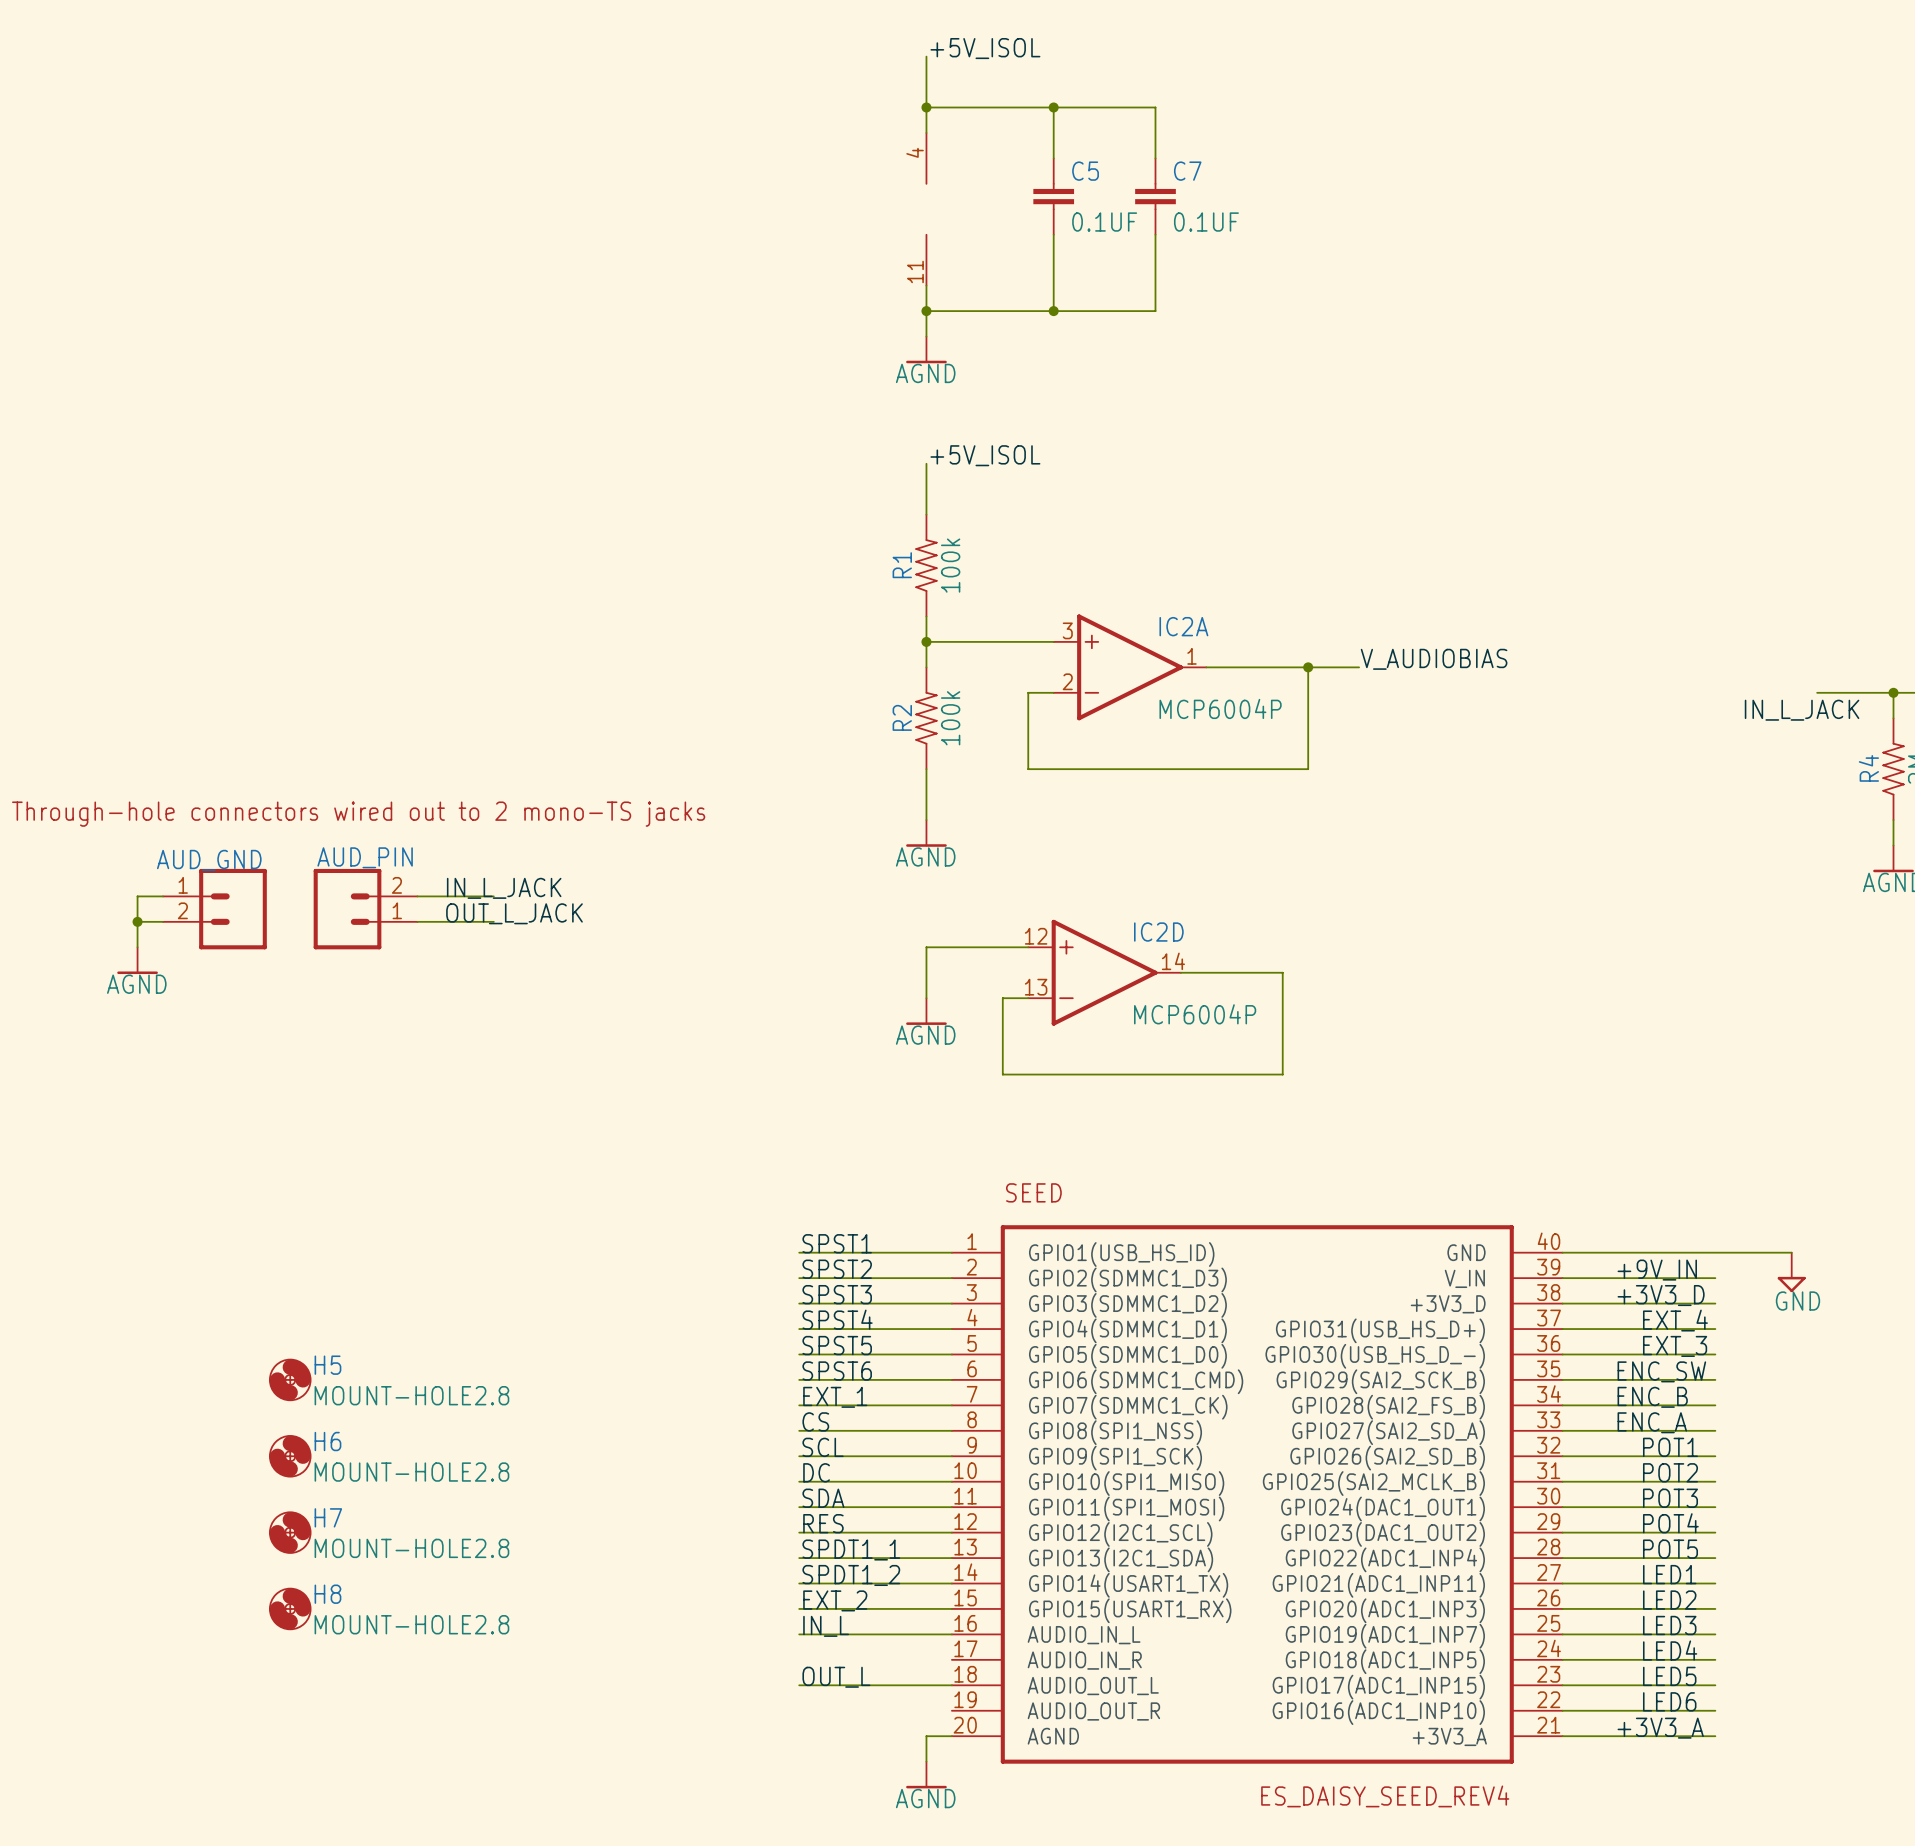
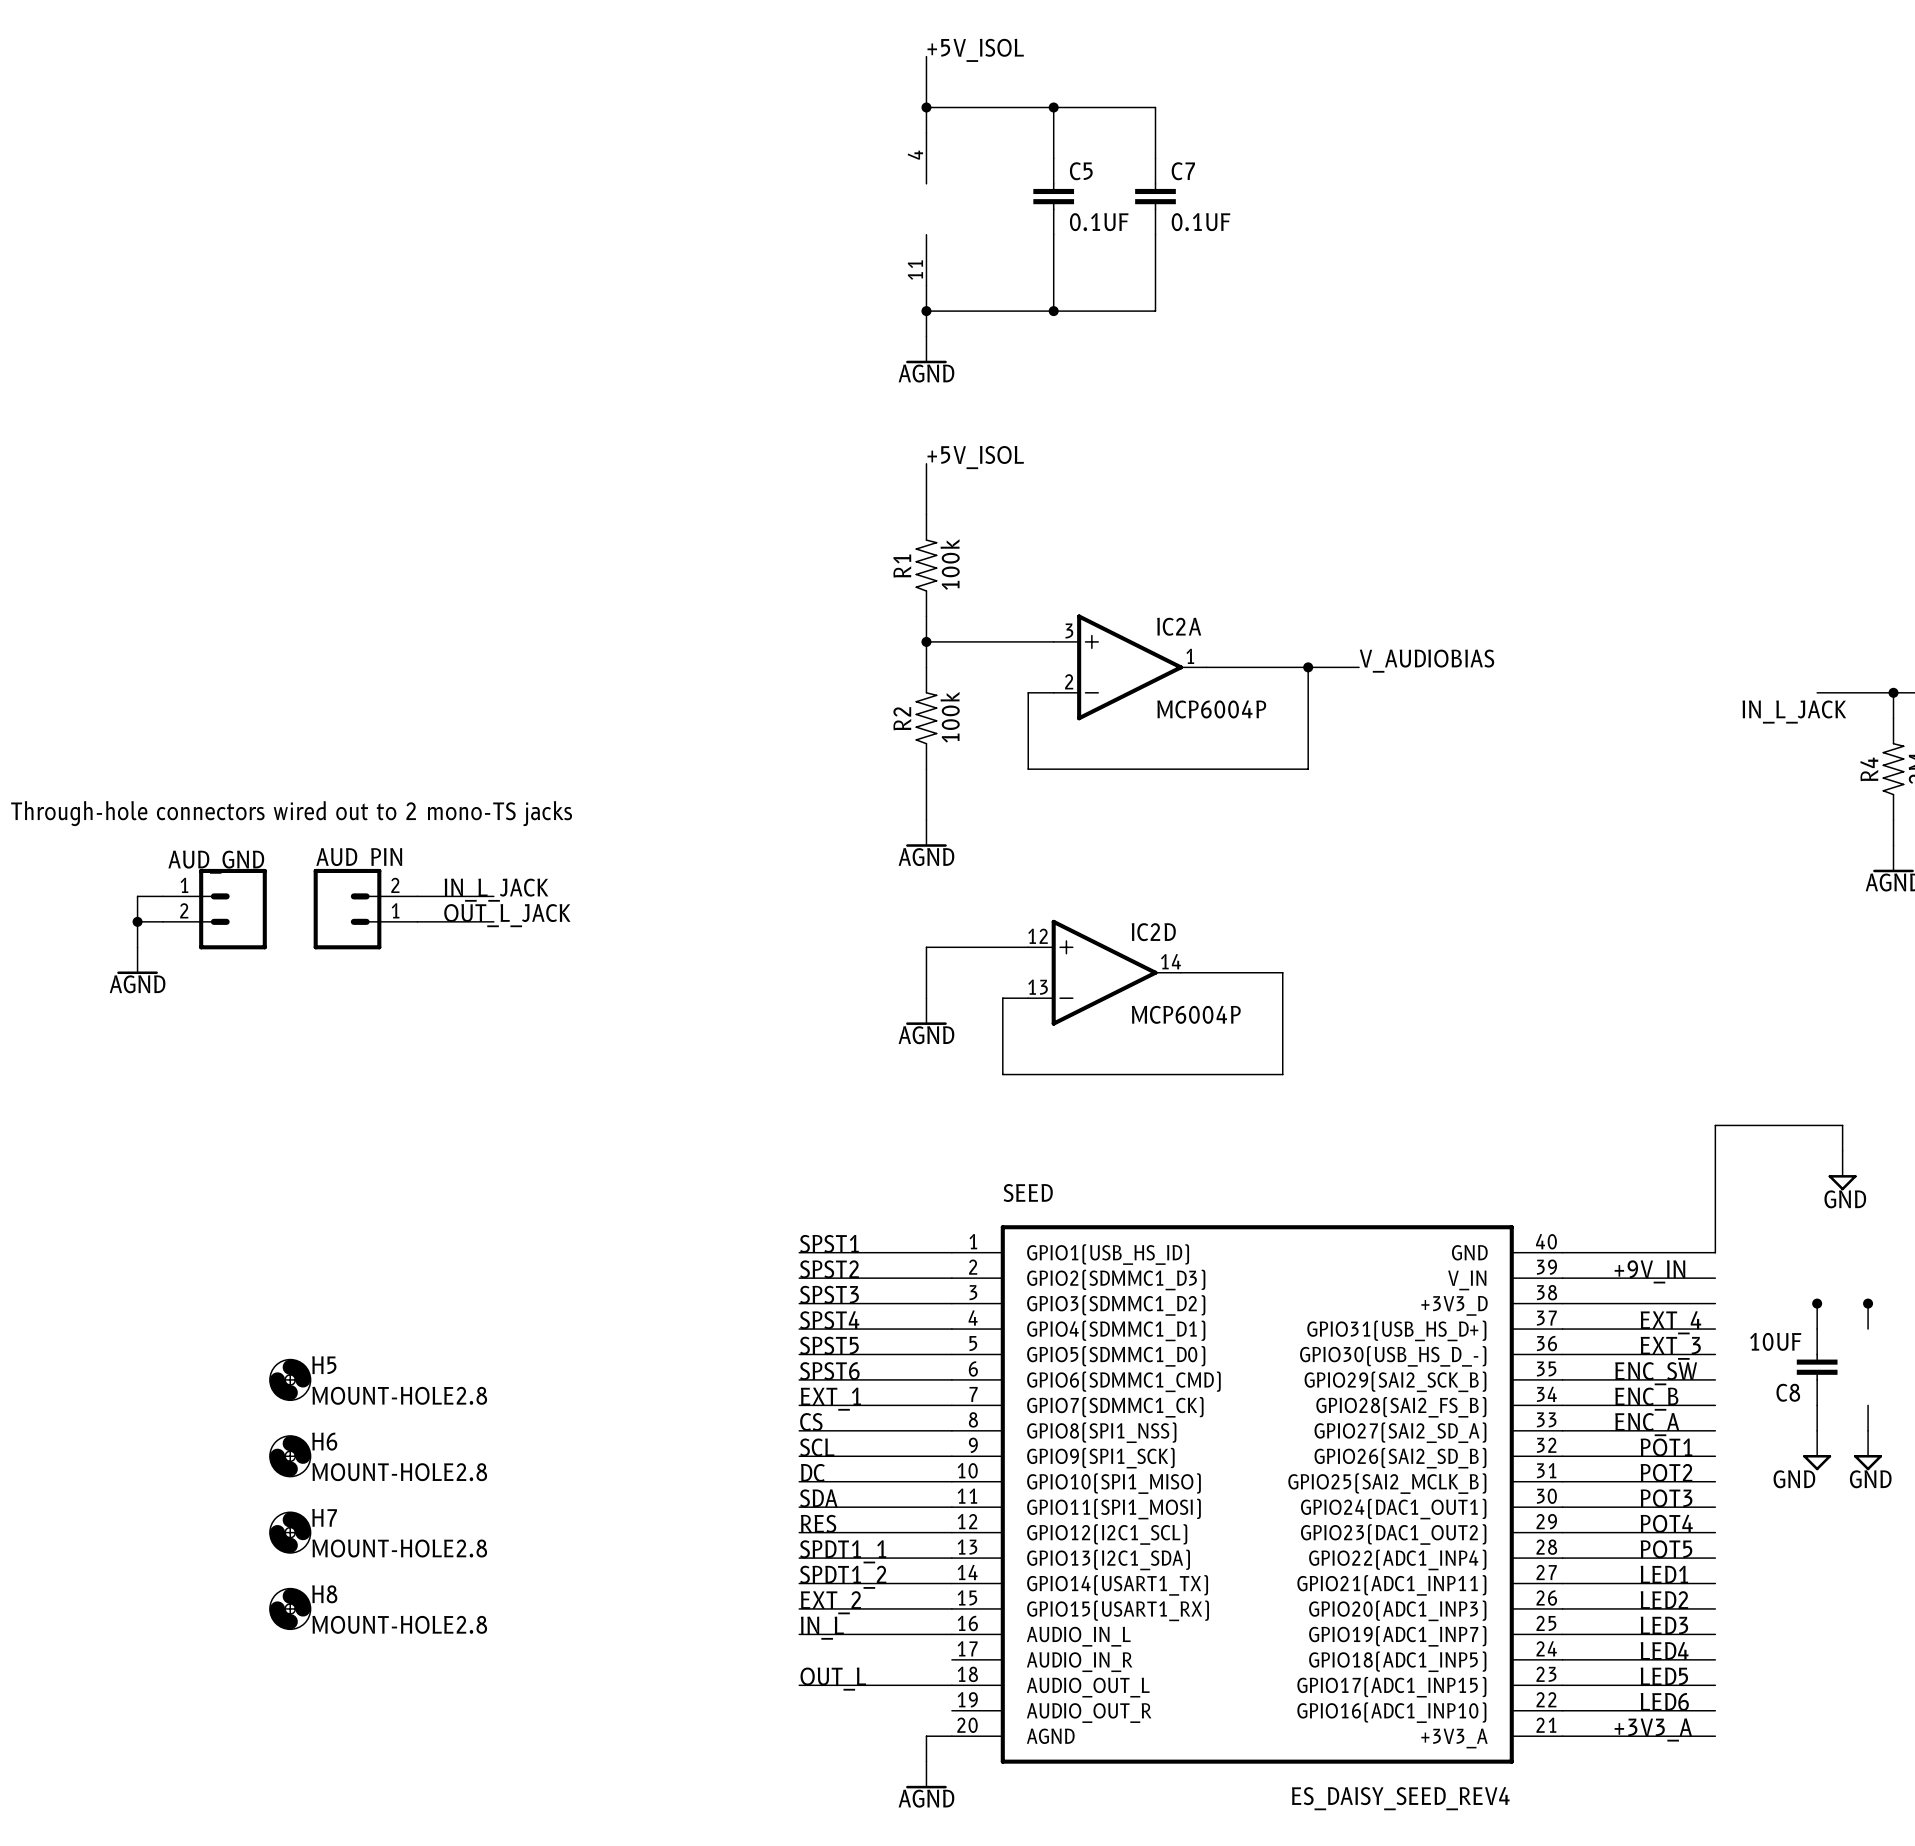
power symbol: none -> GND (1842, 1170)
wire: (1715, 1252) (1791, 1252) -> (1715, 1252) (1715, 1125) (1842, 1125) (1842, 1150)
power symbol: GND (1791, 1272) -> none
label: +3V3_D (1661, 1295) -> none
wire: none -> (1817, 1303) (1817, 1329)
junction: none -> (1817, 1303)
wire: none -> (1868, 1303) (1868, 1329)
junction: none -> (1868, 1303)
C8: none -> 10UF (1817, 1367)
wire: none -> (1817, 1405) (1817, 1430)
wire: none -> (1868, 1405) (1868, 1430)
power symbol: none -> GND (1817, 1450)
power symbol: none -> GND (1868, 1450)

